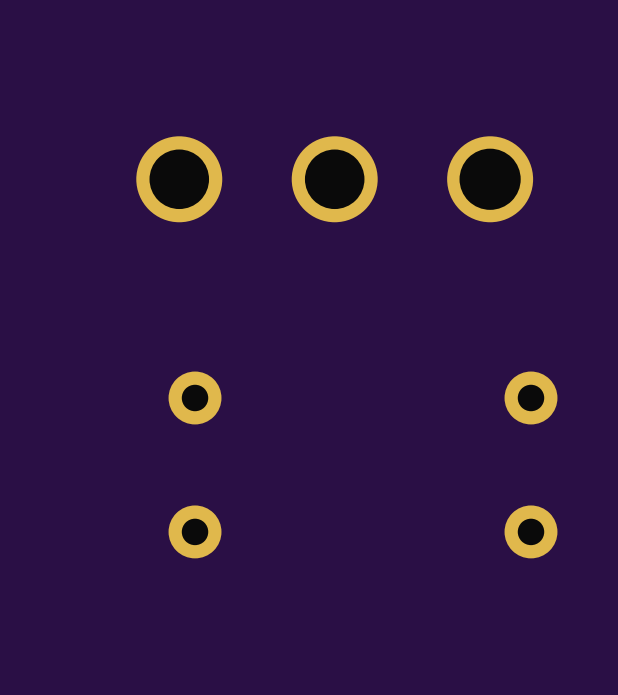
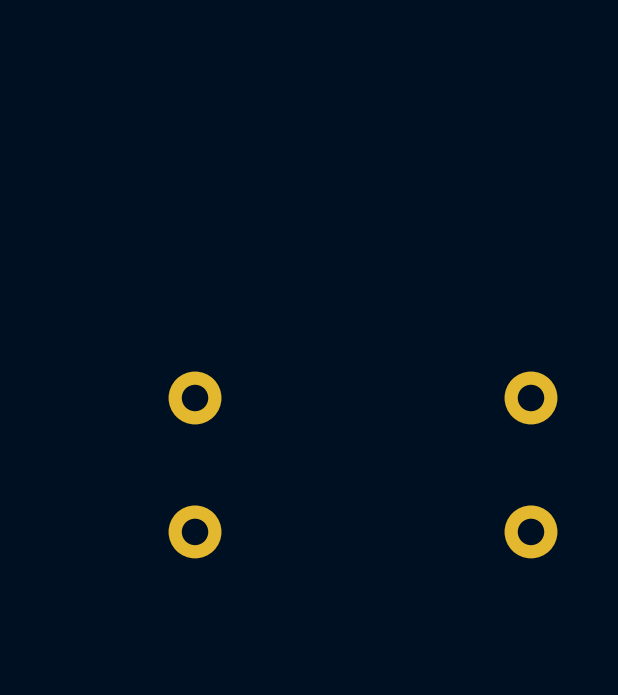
part: (334, 179) -> none

